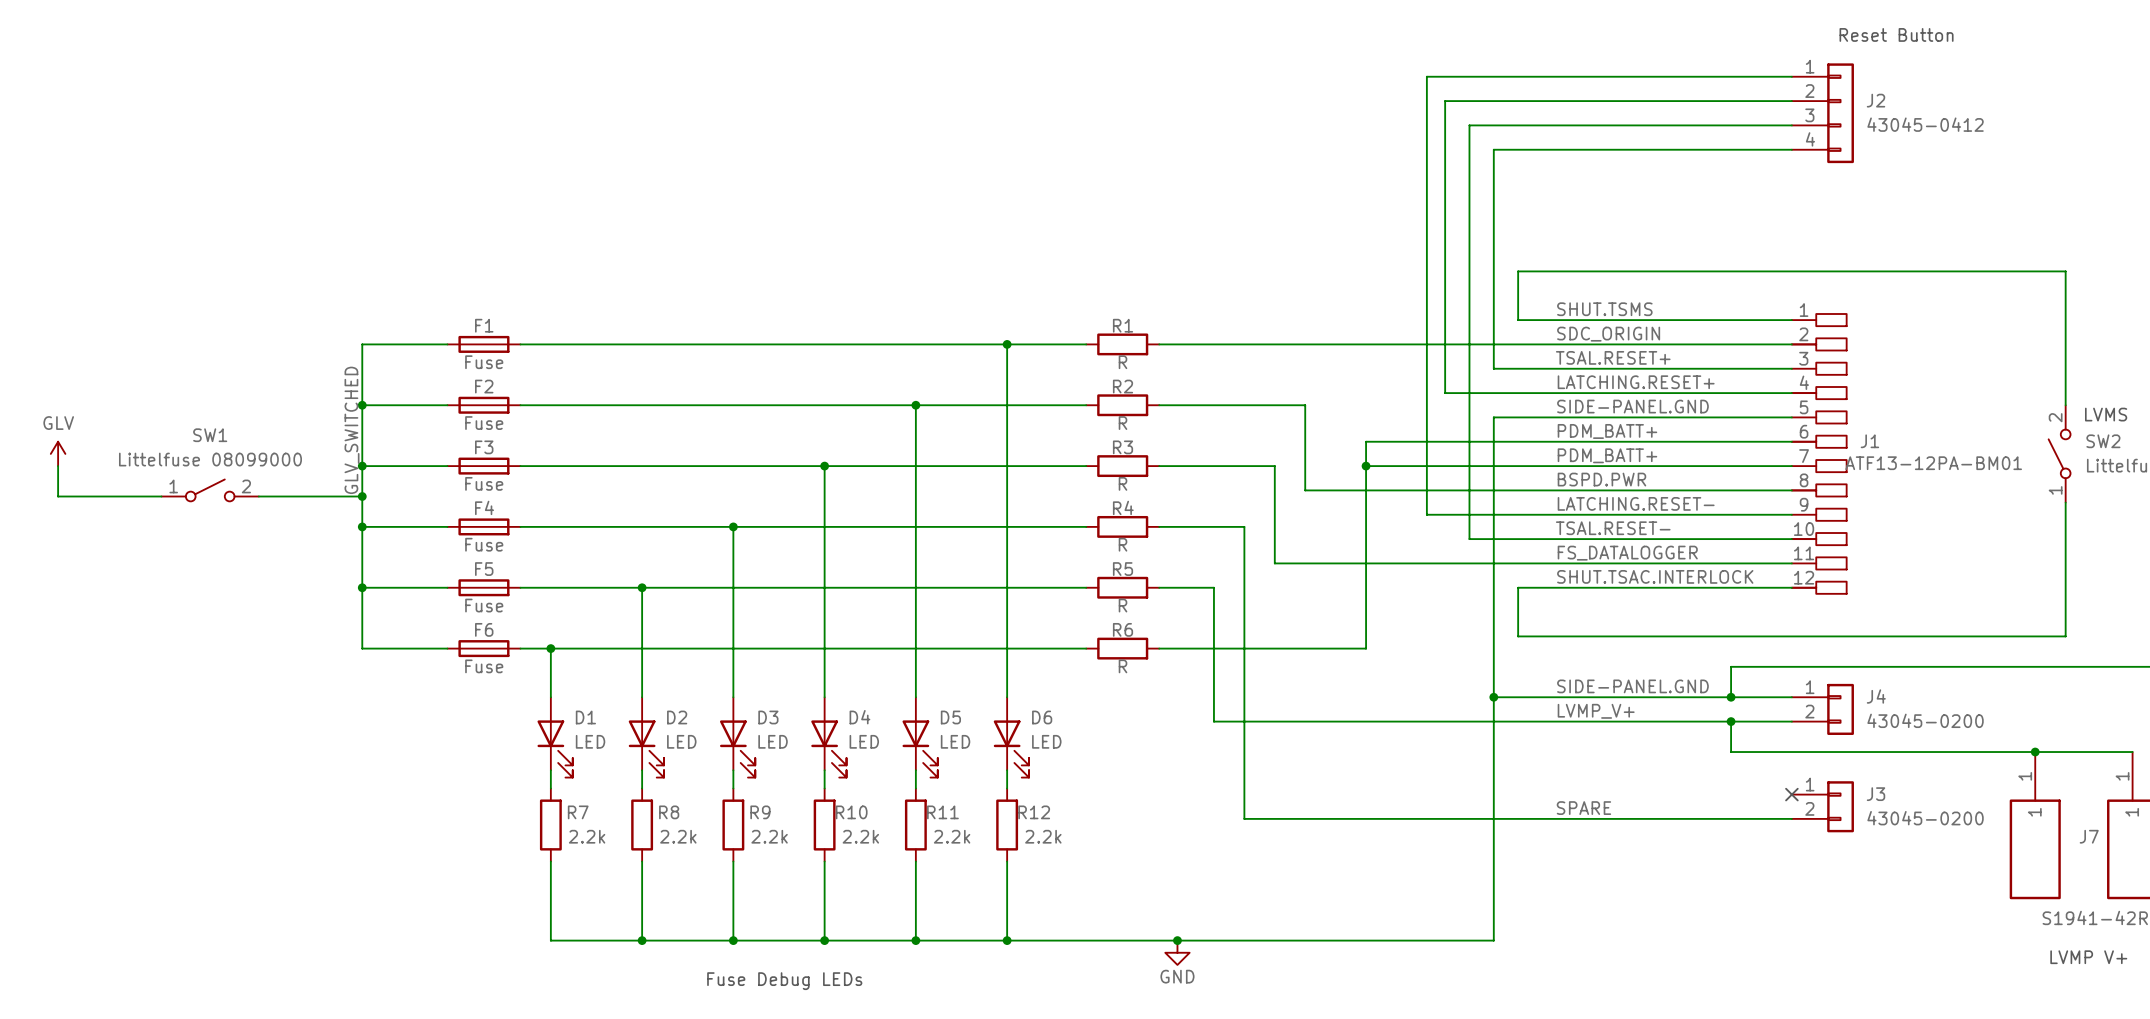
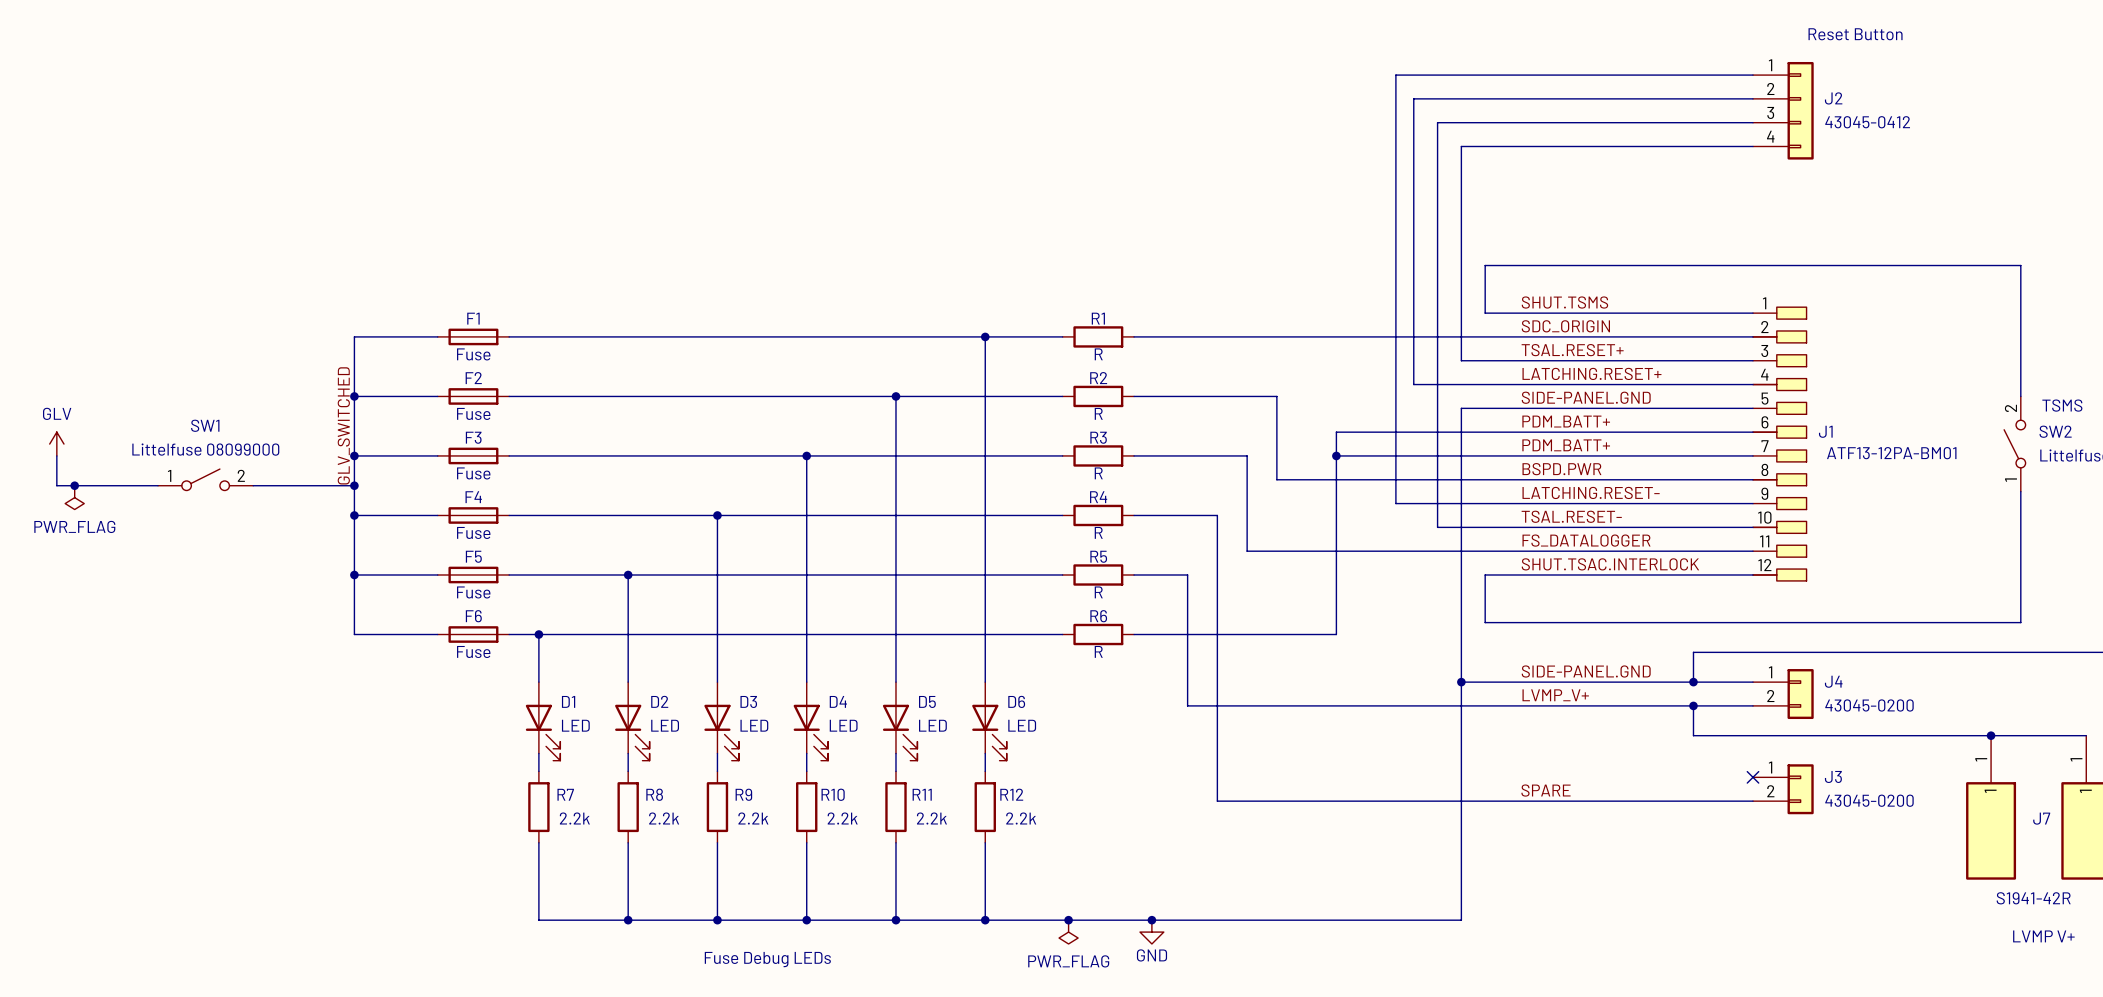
text: LVMS (2106, 414) -> TSMS (2062, 405)
junction: none -> (74, 485)
power symbol: none -> PWR_FLAG (74, 497)
junction: none -> (1068, 920)
power symbol: none -> PWR_FLAG (1068, 932)

